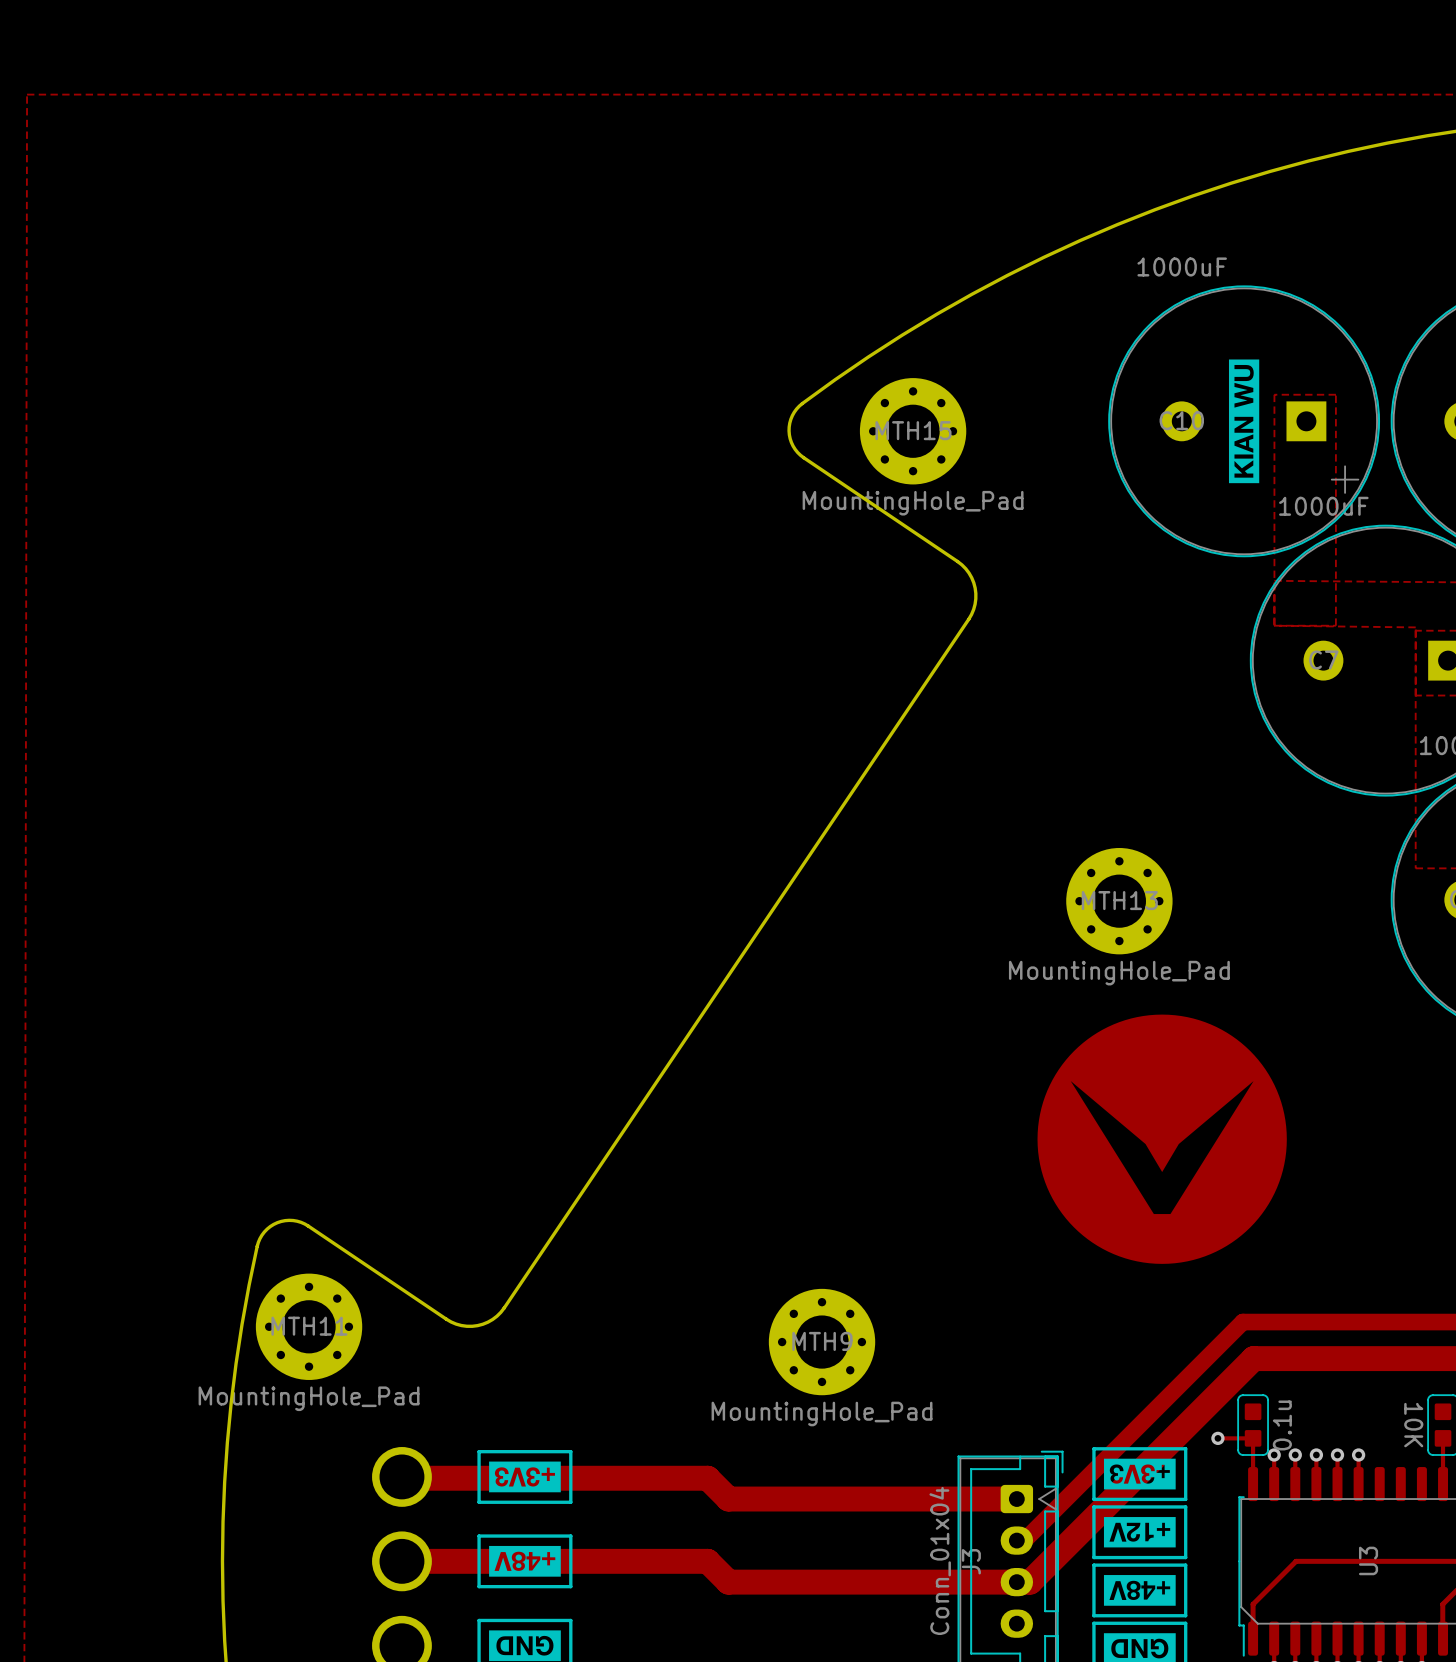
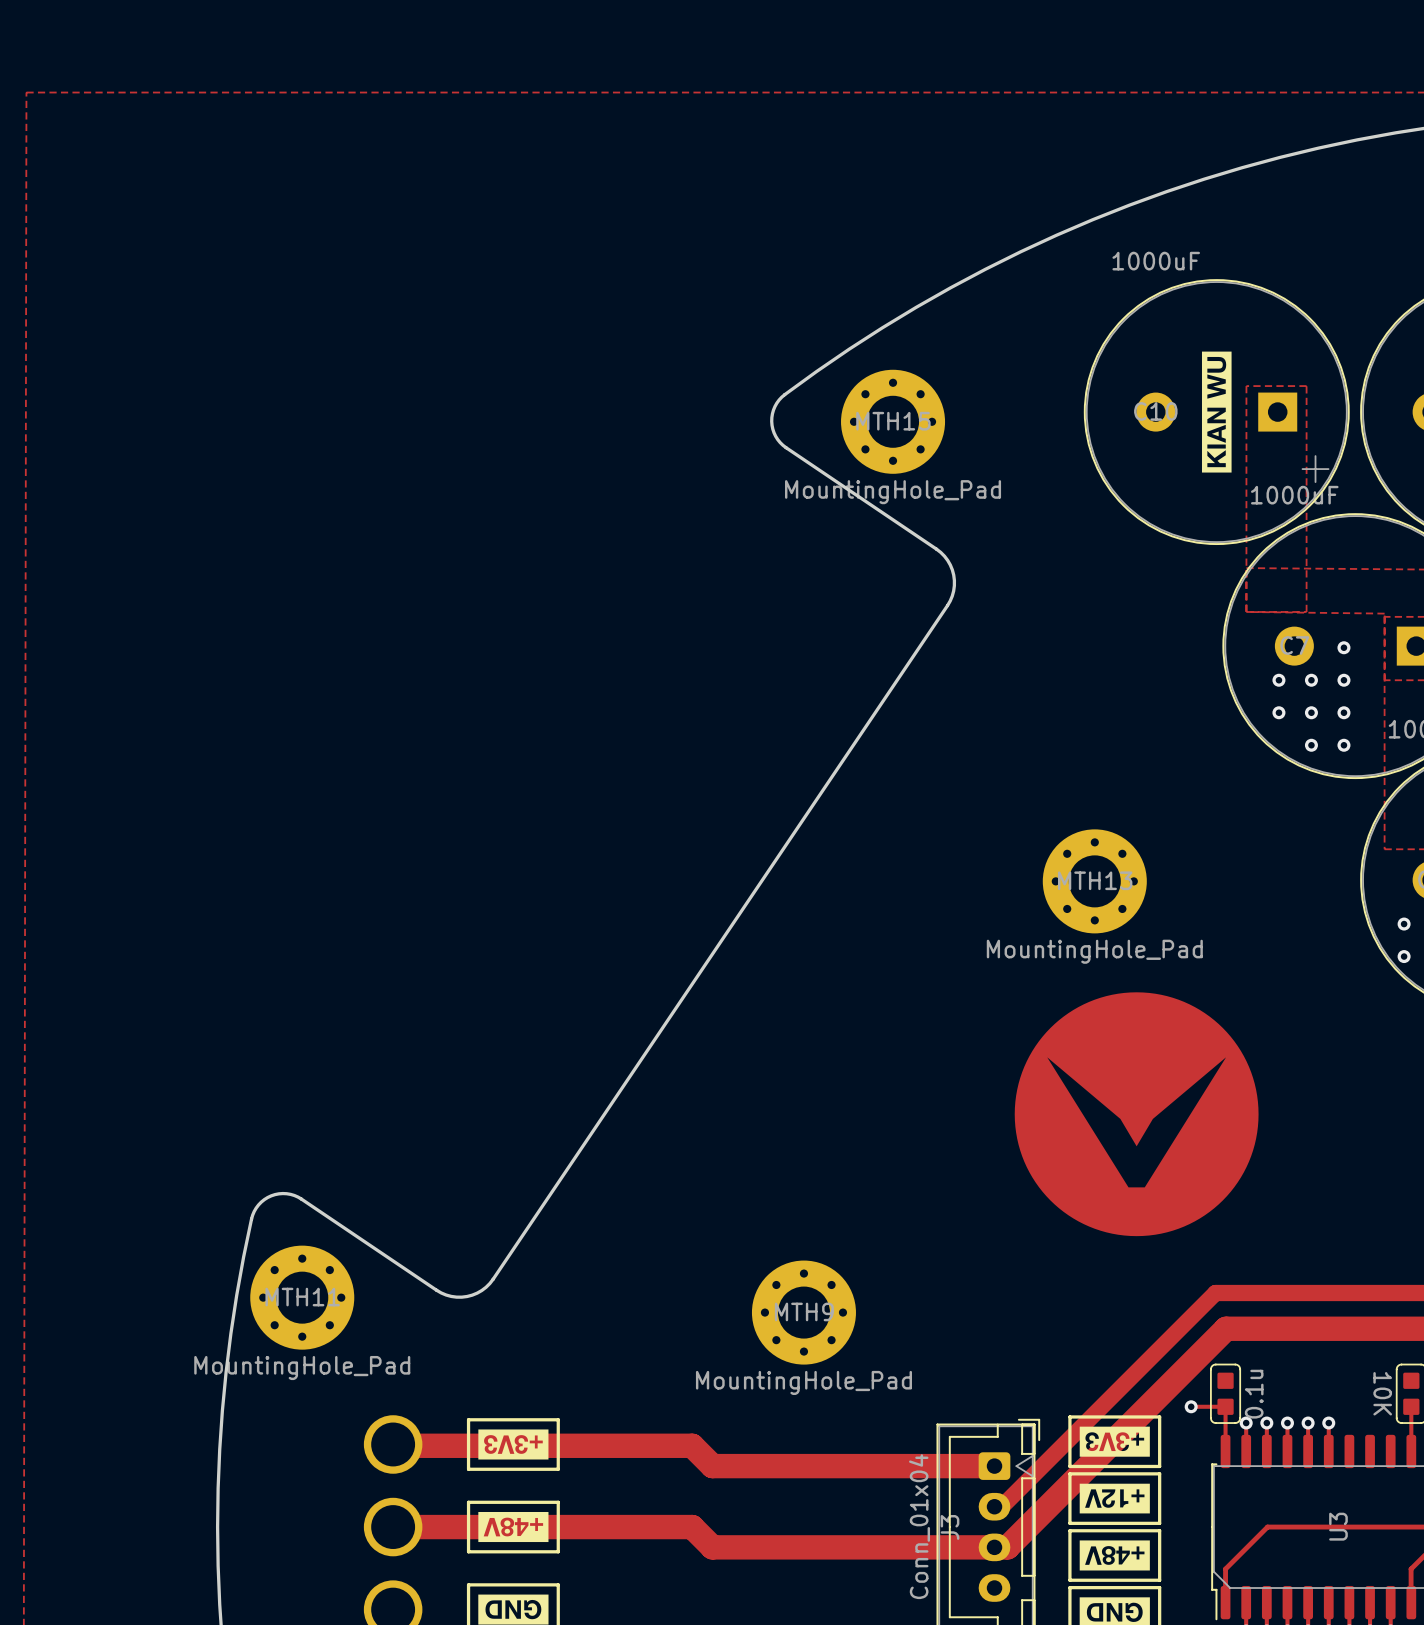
via: none -> (1343, 647)
via: none -> (1278, 680)
via: none -> (1311, 680)
via: none -> (1343, 680)
via: none -> (1278, 712)
via: none -> (1311, 712)
via: none -> (1343, 712)
via: none -> (1311, 745)
via: none -> (1343, 745)
via: none -> (1404, 924)
via: none -> (1404, 956)

